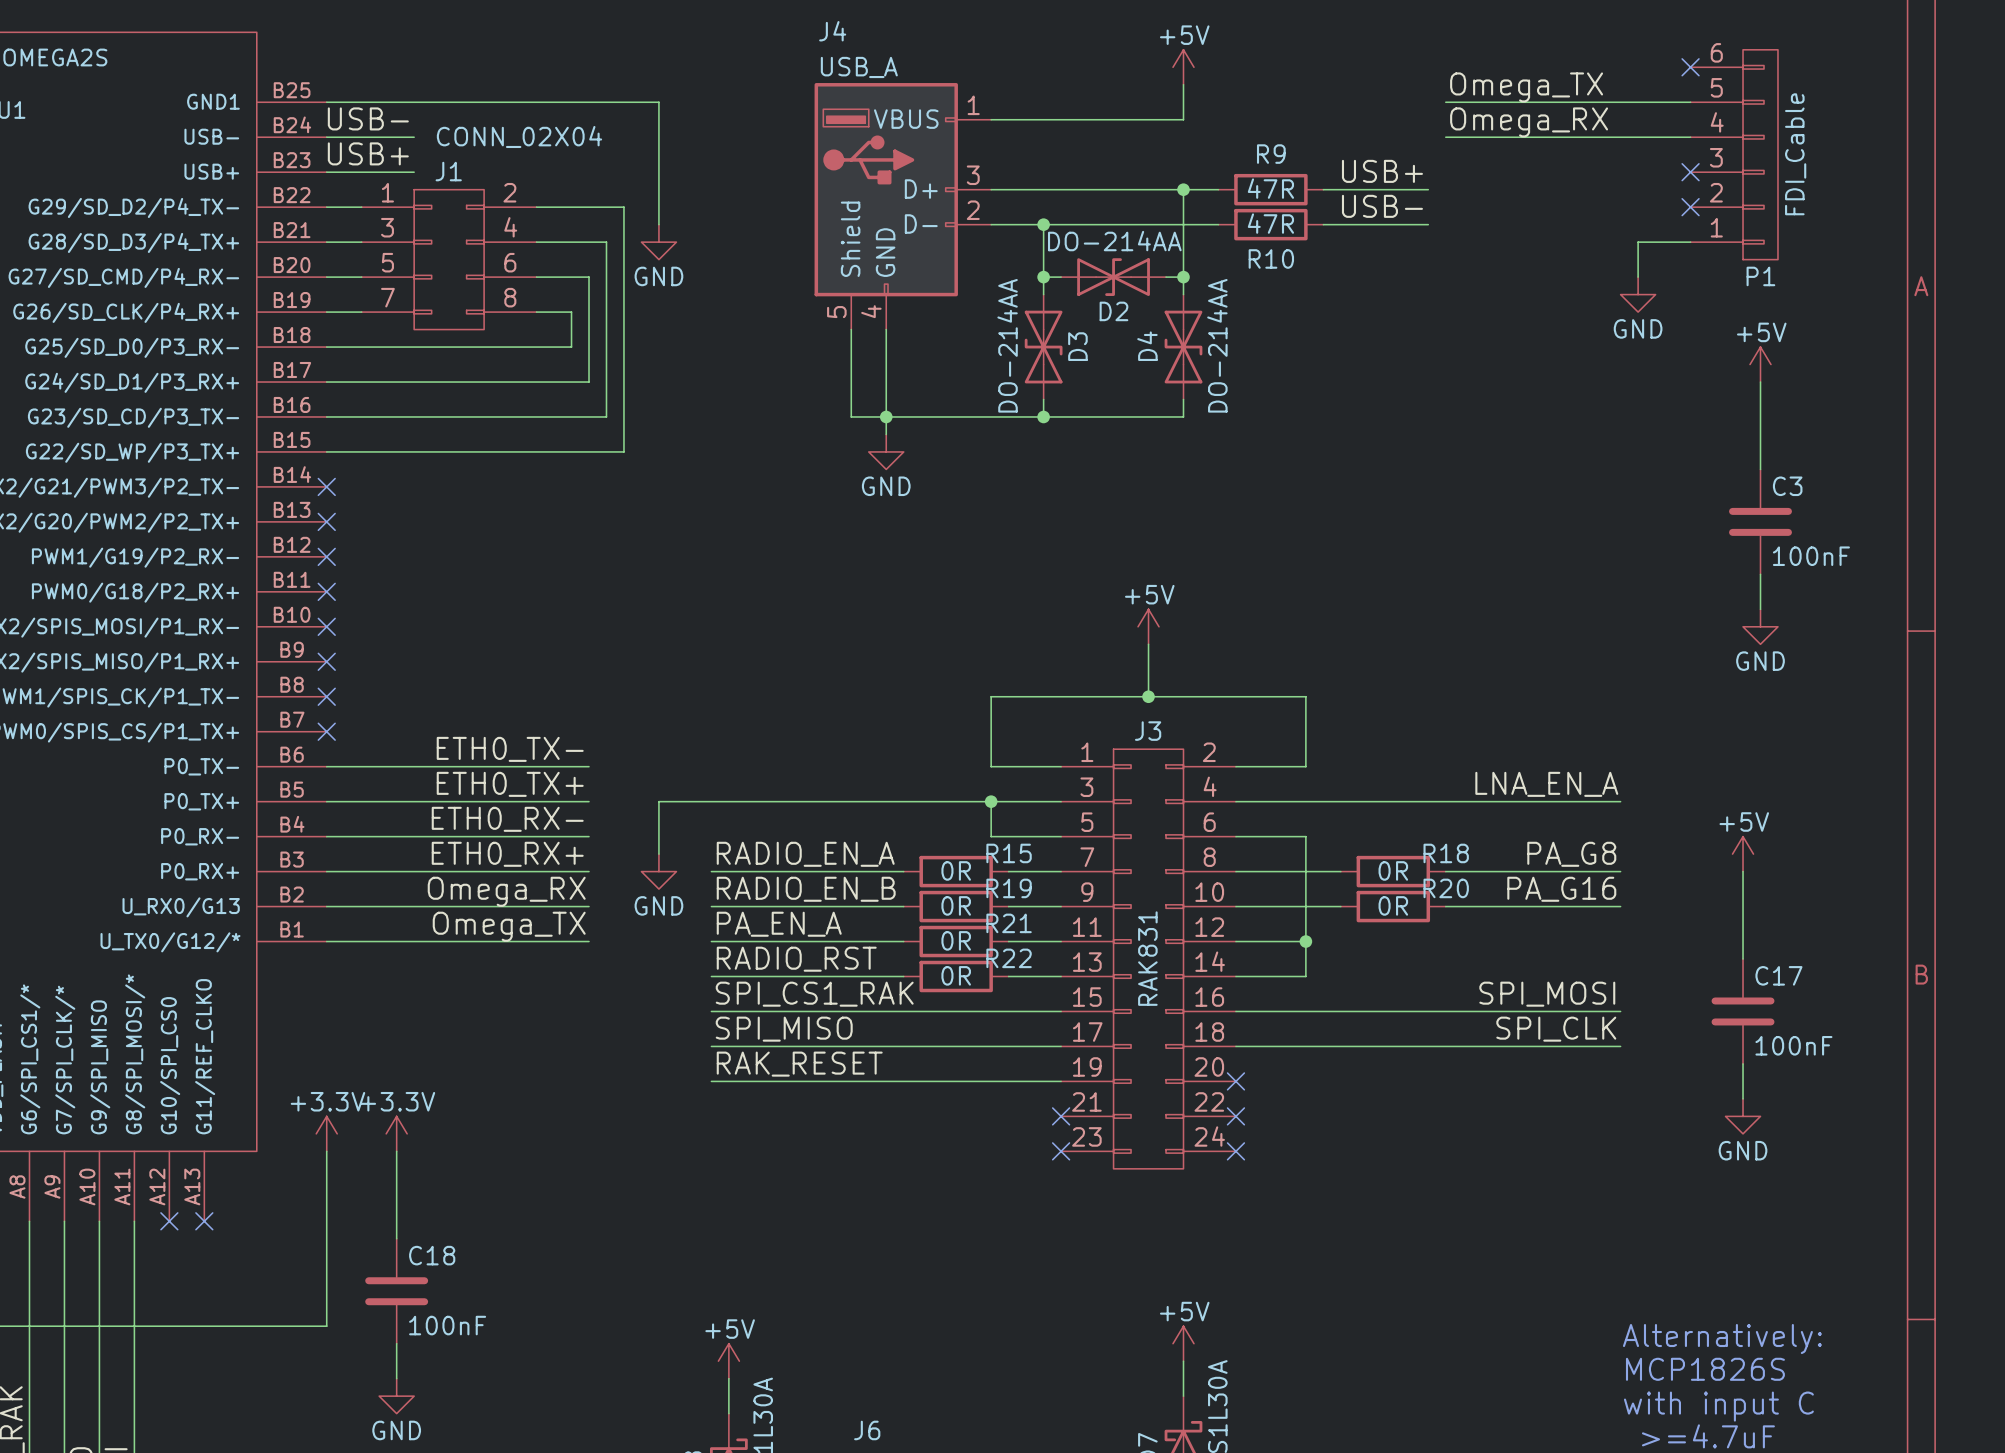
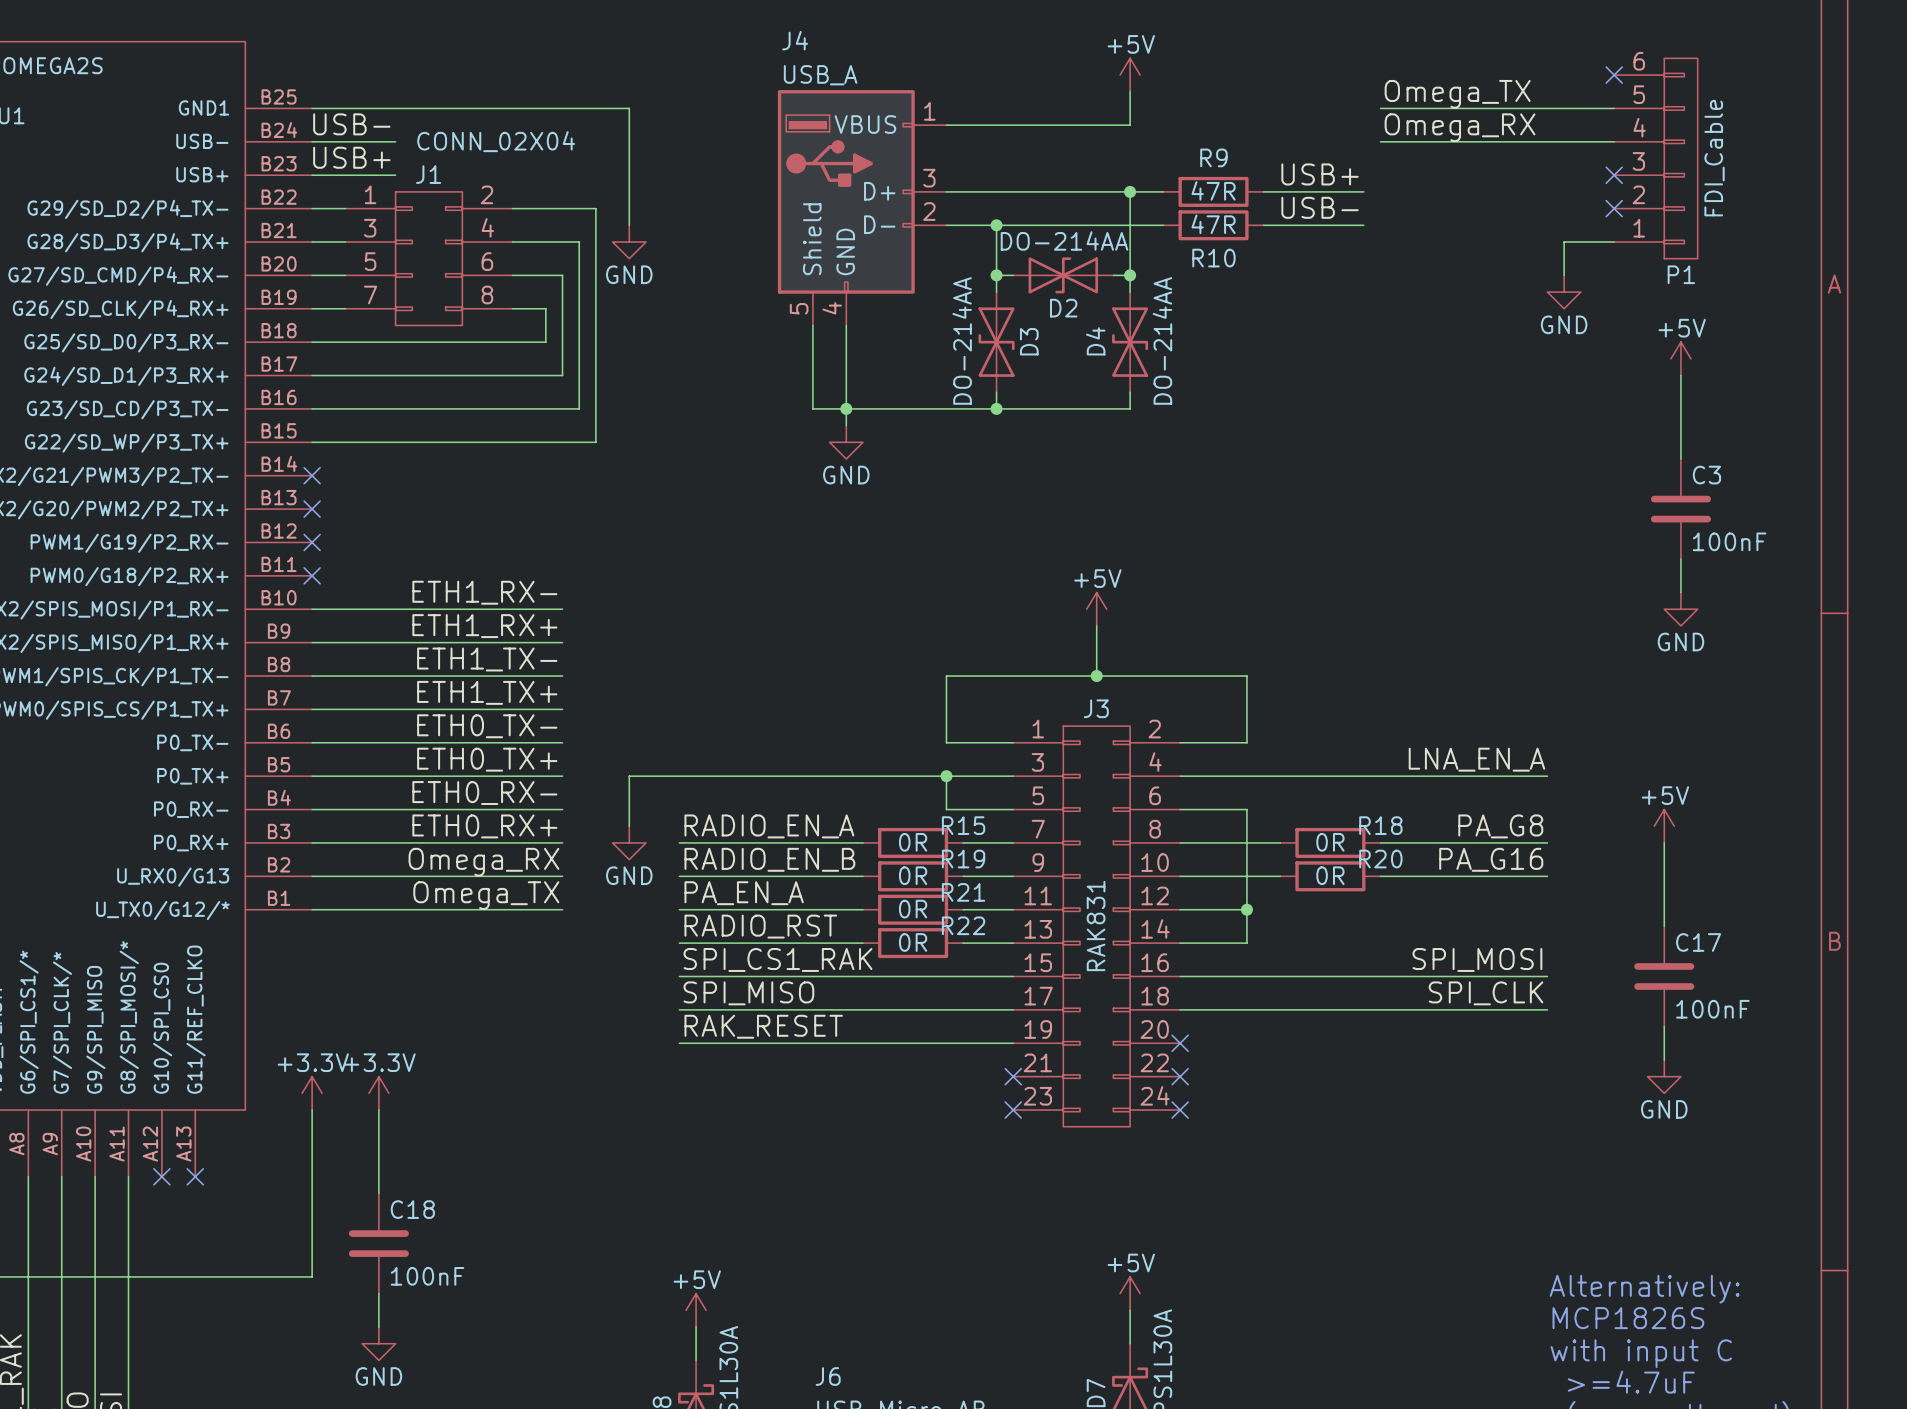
label: none -> ETH1_RX- (484, 592)
wire: none -> (312, 609) (562, 609)
no-connect mark: (326, 626) -> none
label: none -> ETH1_RX+ (484, 626)
wire: none -> (312, 642) (562, 642)
no-connect mark: (326, 661) -> none
label: none -> ETH1_TX- (487, 659)
wire: none -> (312, 676) (562, 676)
no-connect mark: (326, 696) -> none
label: none -> ETH1_TX+ (487, 692)
wire: none -> (312, 709) (562, 709)
no-connect mark: (326, 731) -> none

